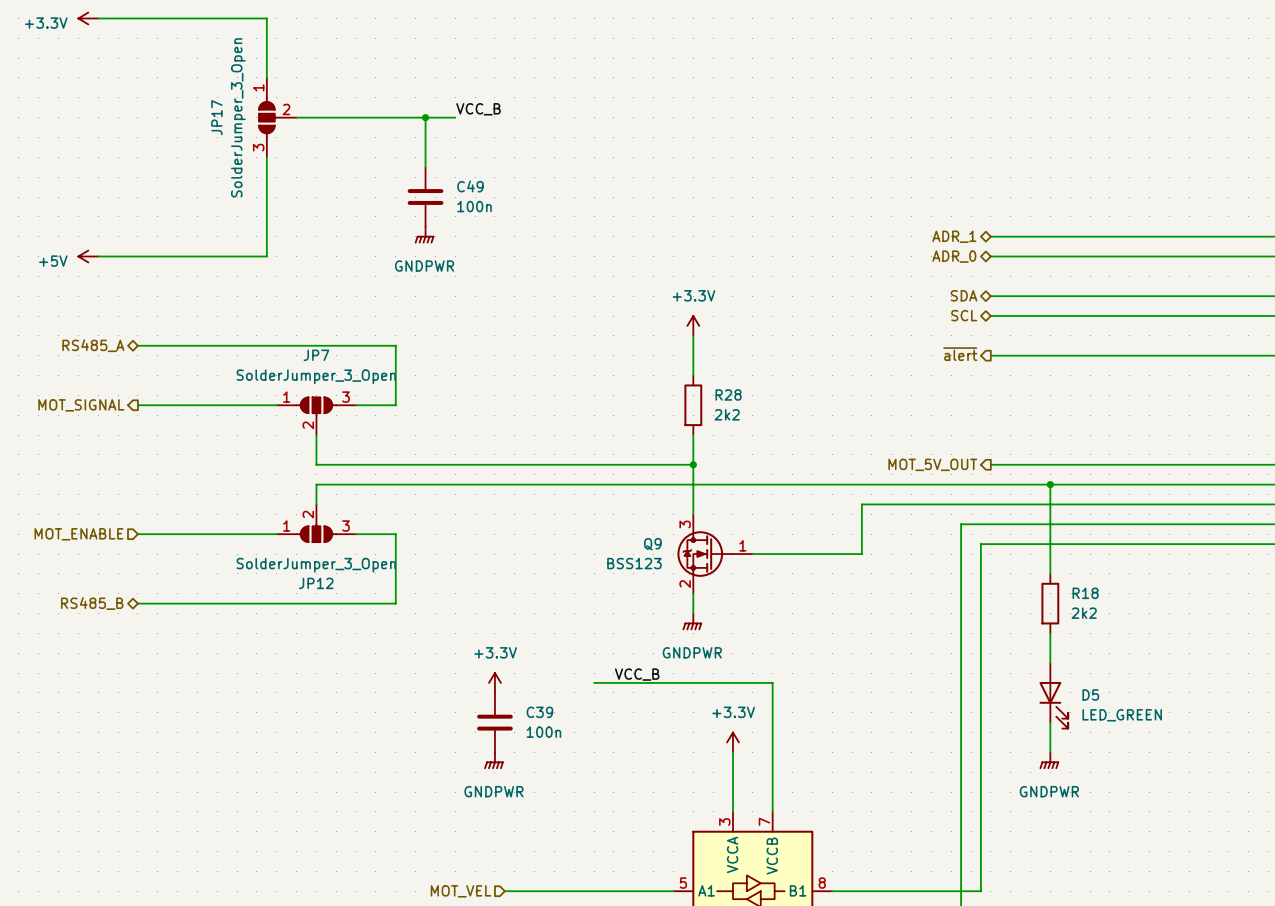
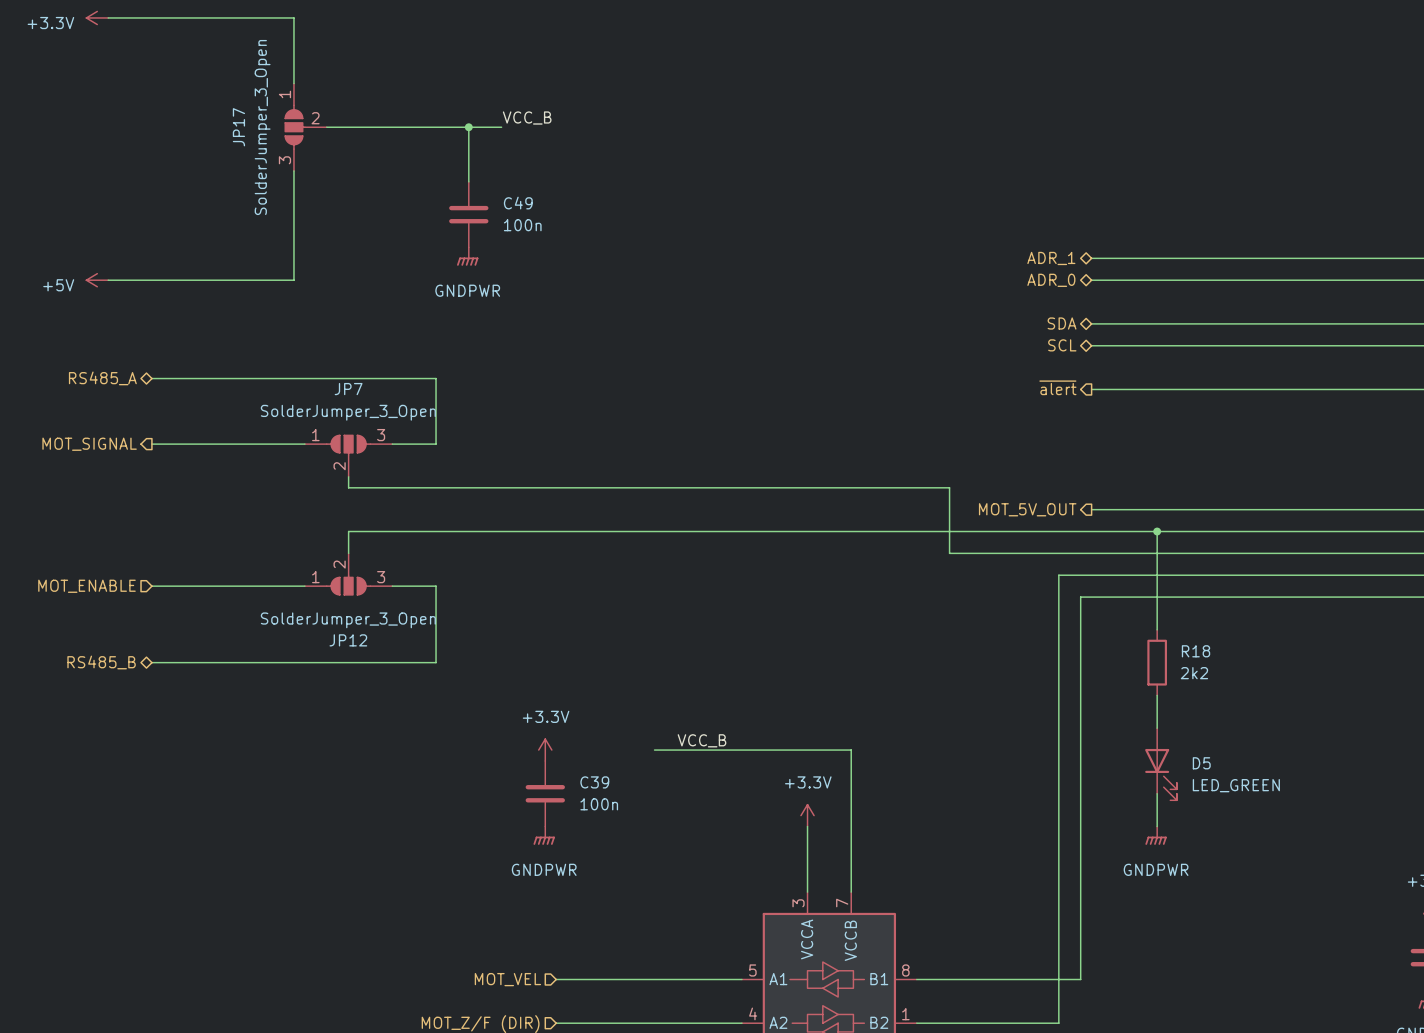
power symbol: +3.3V (693, 325) -> none
wire: (693, 335) (693, 375) -> none
R28: 2k2 (693, 405) -> none
wire: (693, 435) (693, 514) -> none
wire: (316, 444) (316, 464) (693, 464) -> (348, 487) (949, 487) (949, 553)
junction: (693, 464) -> none
wire: (861, 504) (861, 554) (752, 554) -> none
Q9: BSS123 (715, 554) -> none
wire: (693, 593) (693, 613) -> none
power symbol: GNDPWR (692, 621) -> none

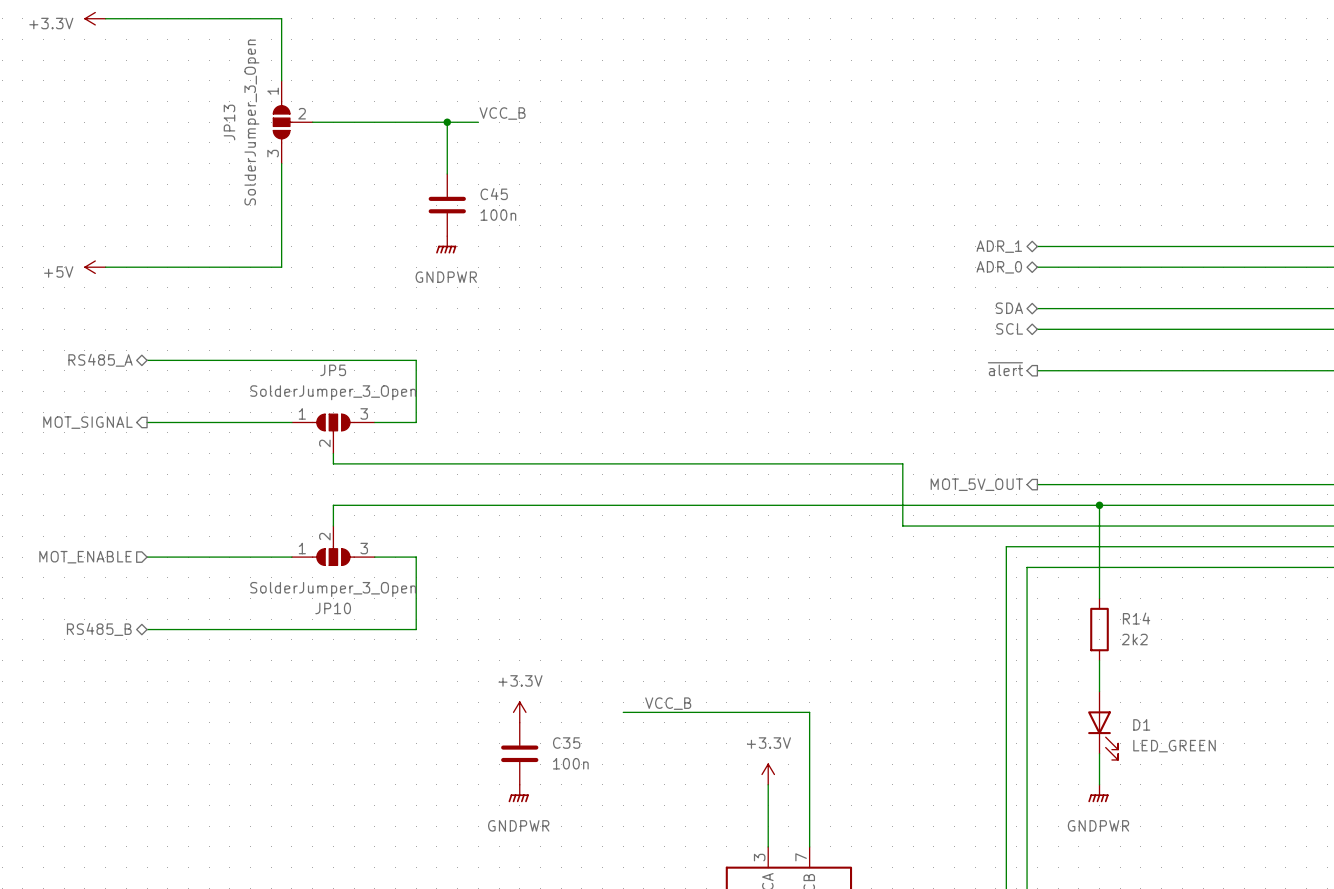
JP17 name: JP17 (238, 127) -> JP13 (229, 122)
C49 name: C49 (518, 203) -> C45 (494, 194)
JP7 name: JP7 (348, 389) -> JP5 (333, 370)
JP12 name: JP12 (348, 640) -> JP10 (333, 608)
R18 name: R18 (1196, 651) -> R14 (1136, 618)
D5 name: D5 (1201, 763) -> D1 (1141, 724)
C39 name: C39 (594, 782) -> C35 (566, 743)

